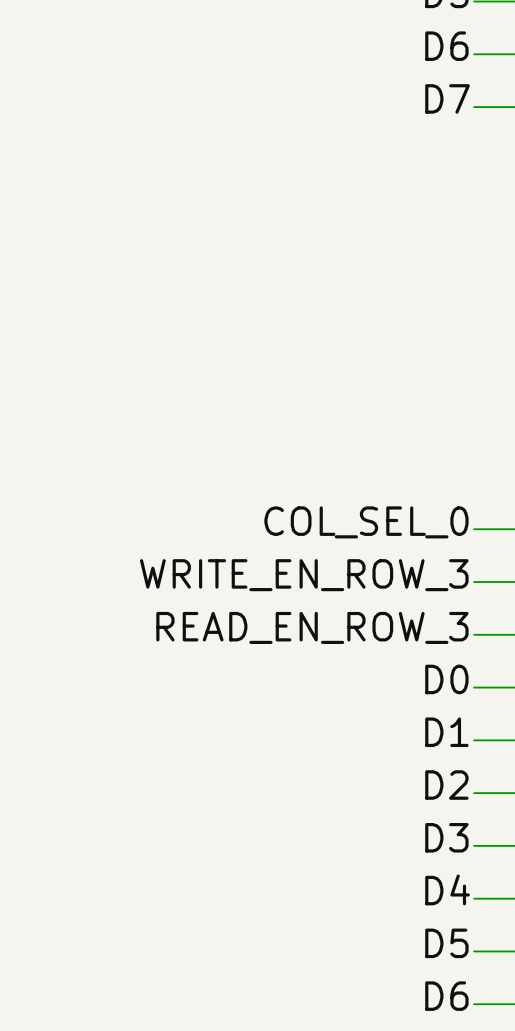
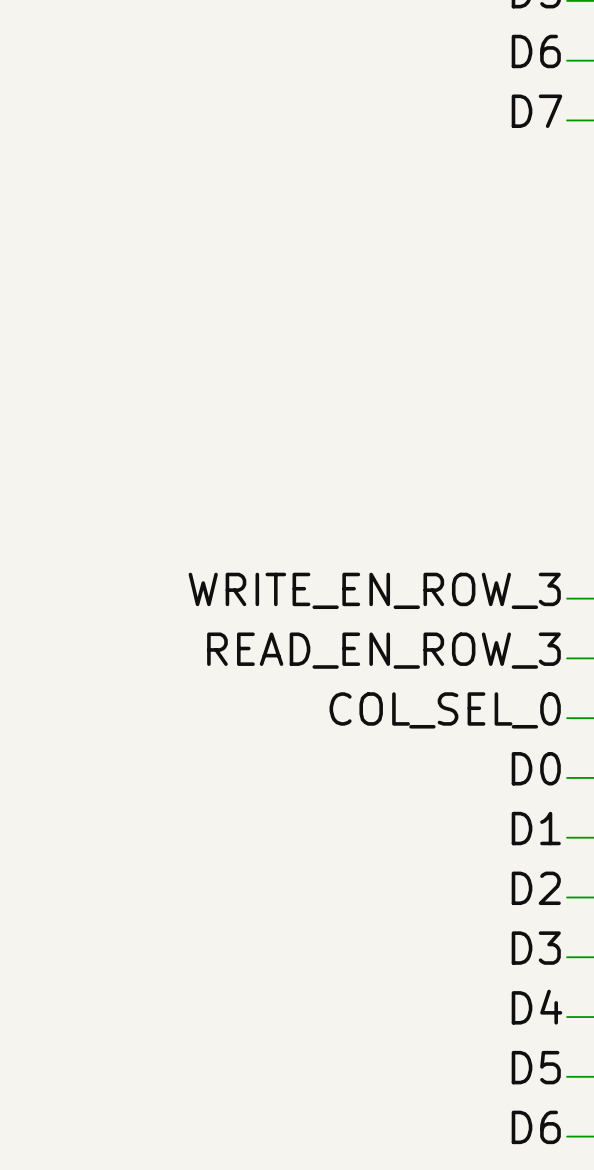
label: COL_SEL_0 (366, 522) -> WRITE_EN_ROW_3 (374, 590)
label: WRITE_EN_ROW_3 (304, 575) -> READ_EN_ROW_3 (383, 650)
label: READ_EN_ROW_3 (312, 627) -> COL_SEL_0 (445, 710)

